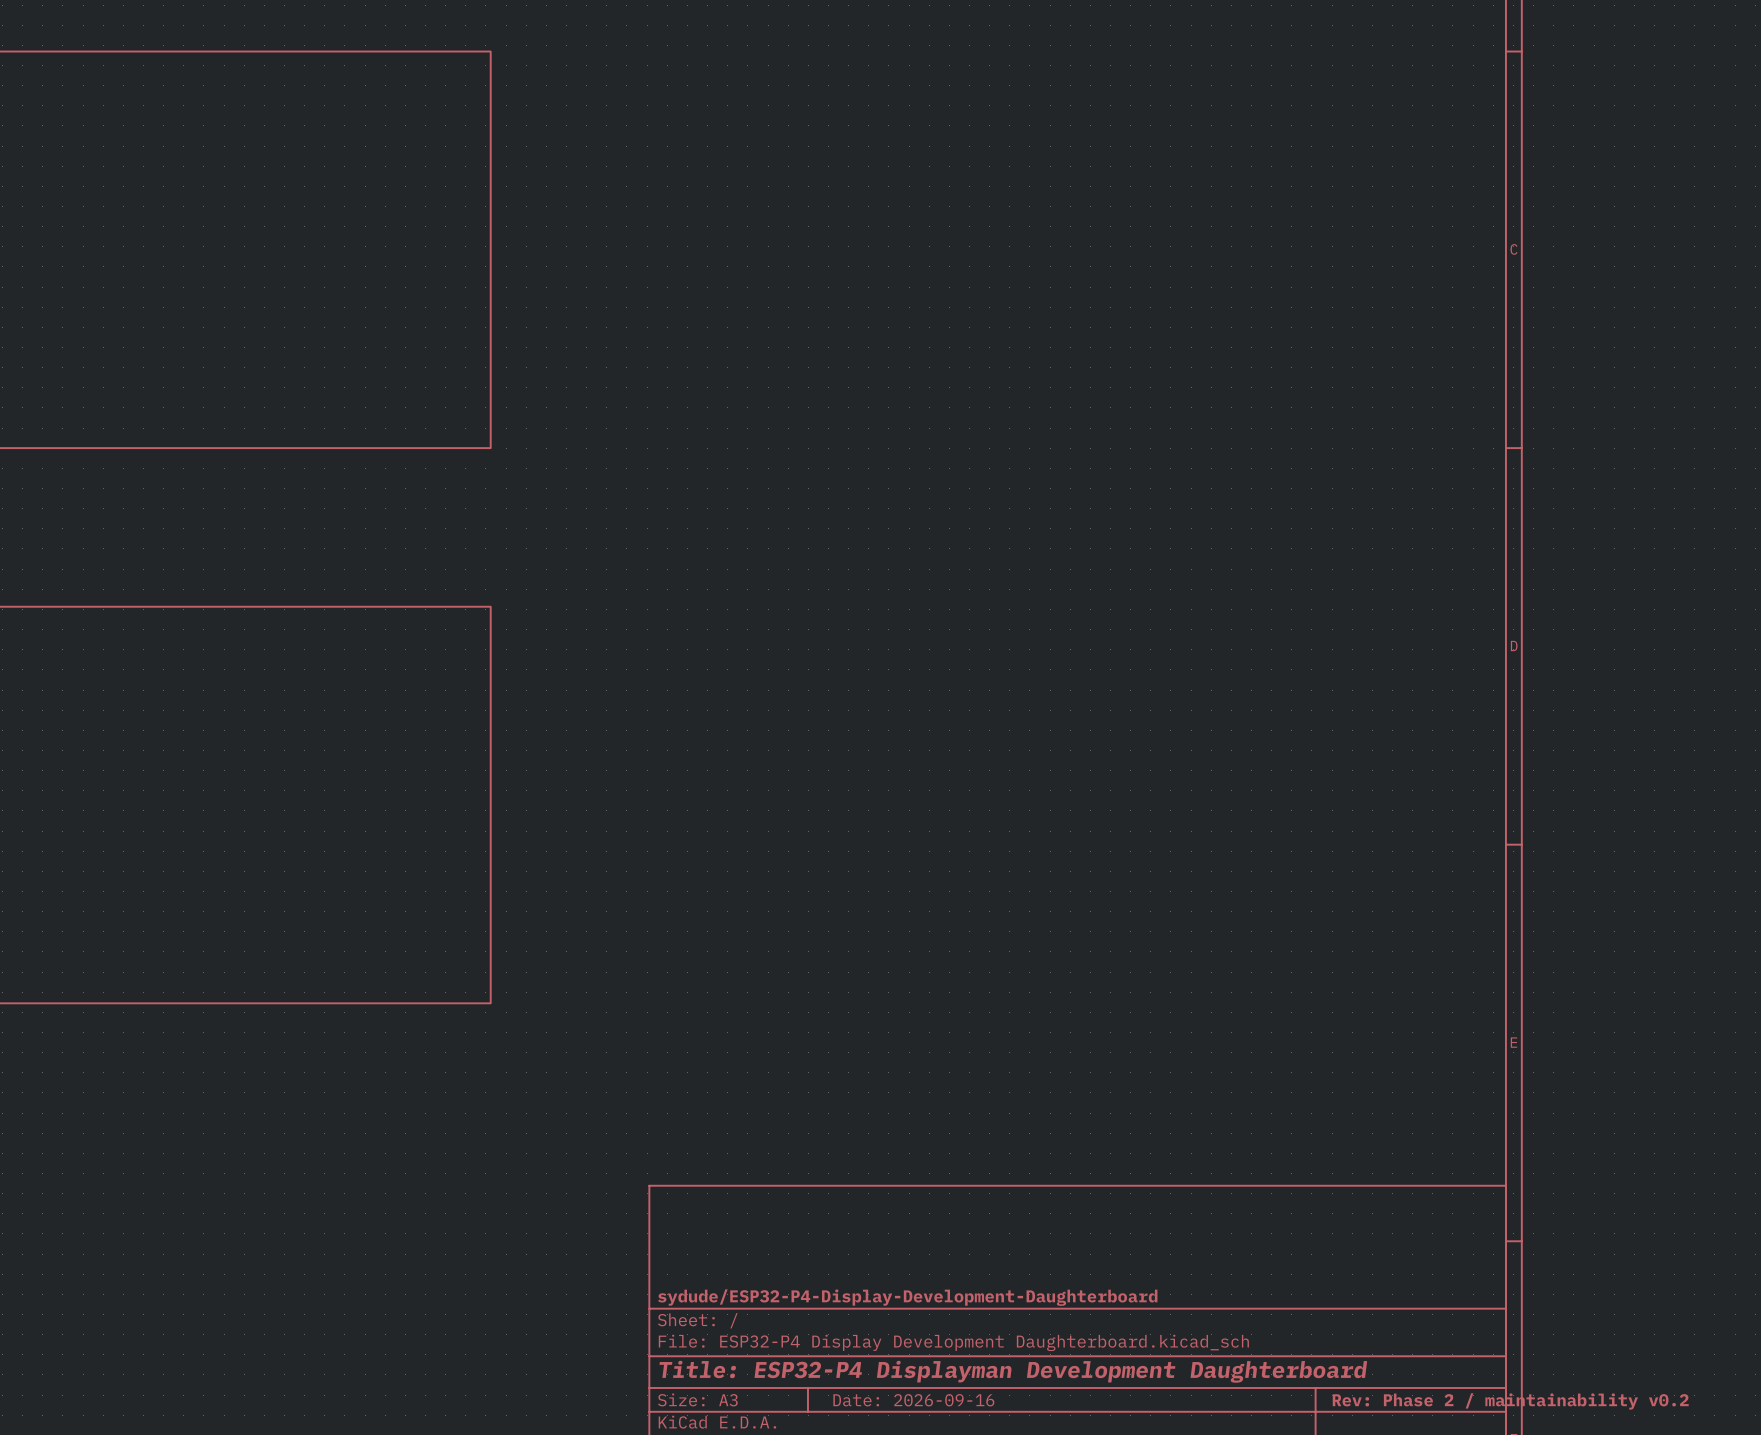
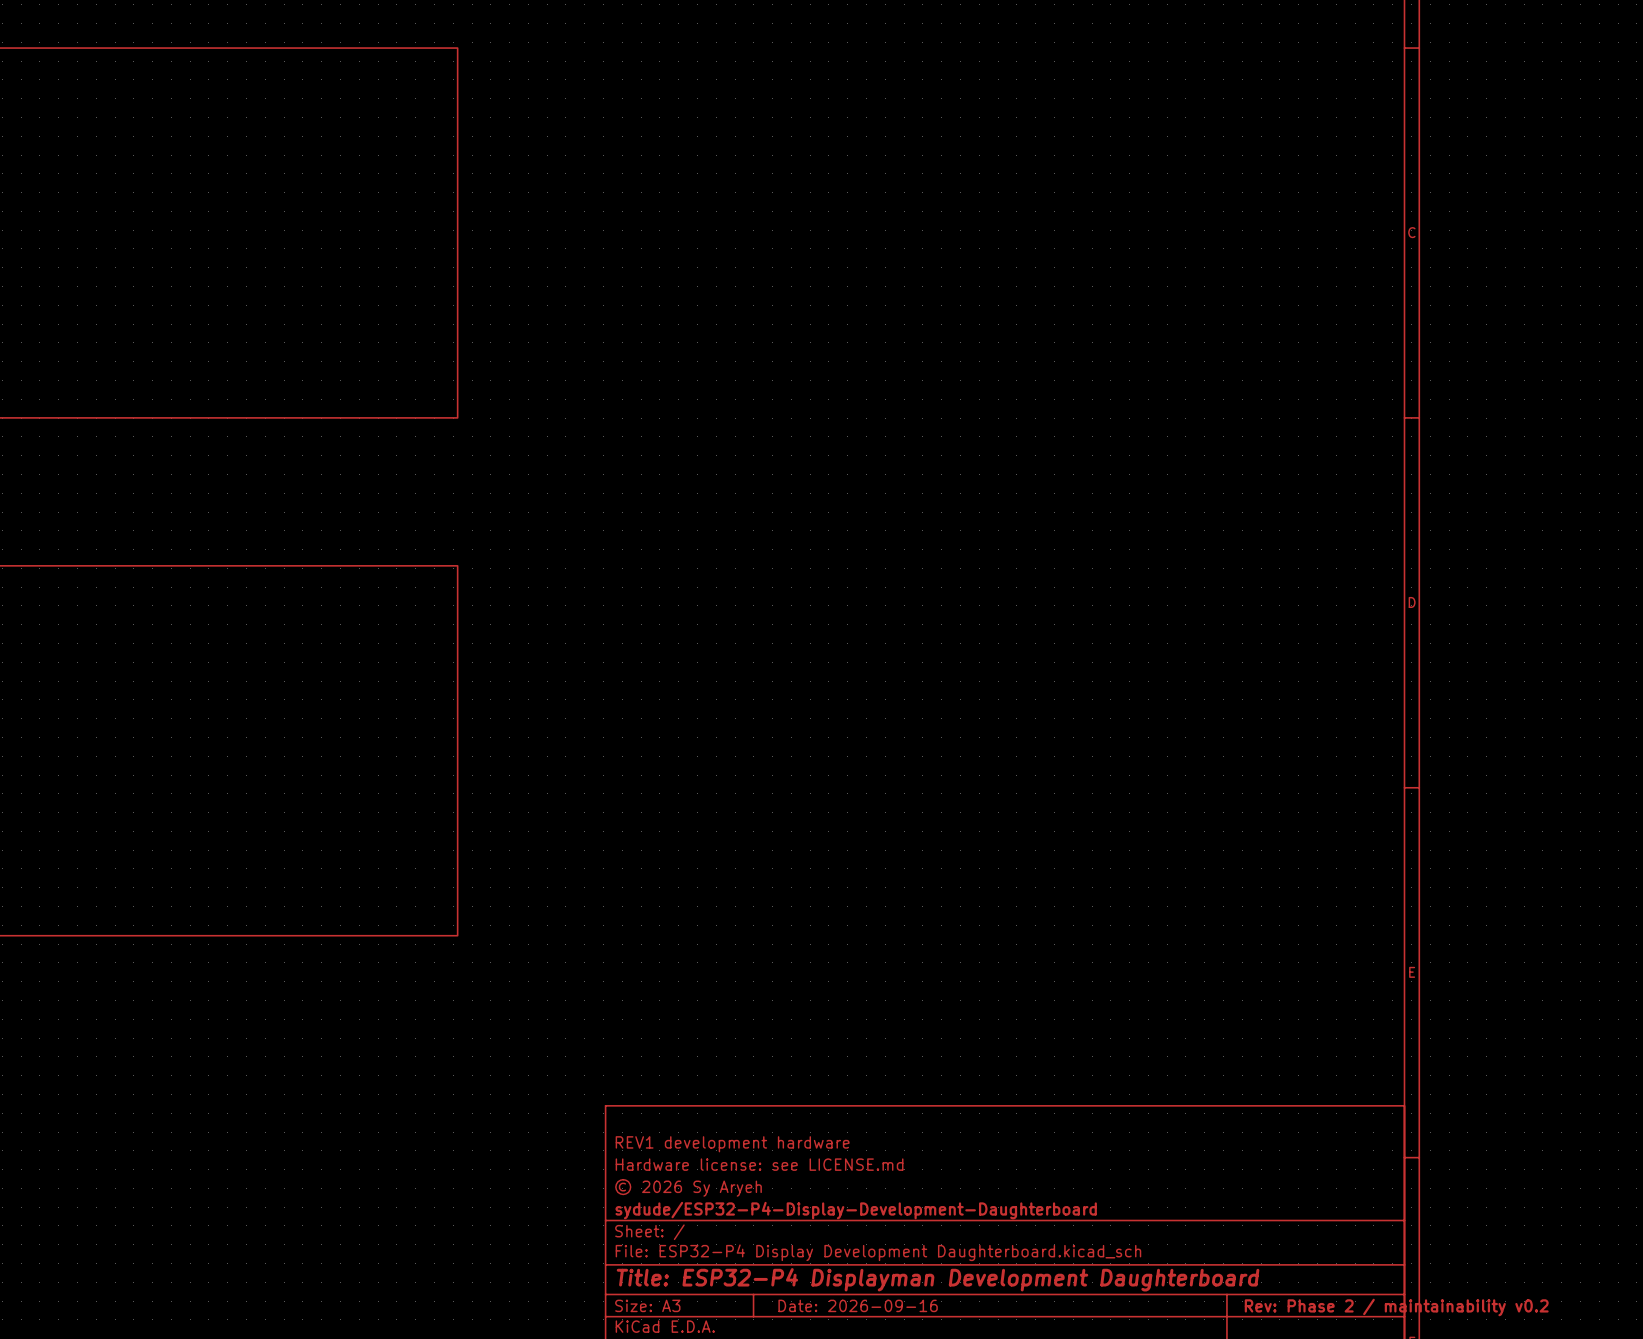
title block: none -> REV1 development hardware (732, 1144)
title block: none -> Hardware license: see LICENSE.md (759, 1164)
title block: none -> © 2026 Sy Aryeh (688, 1187)

